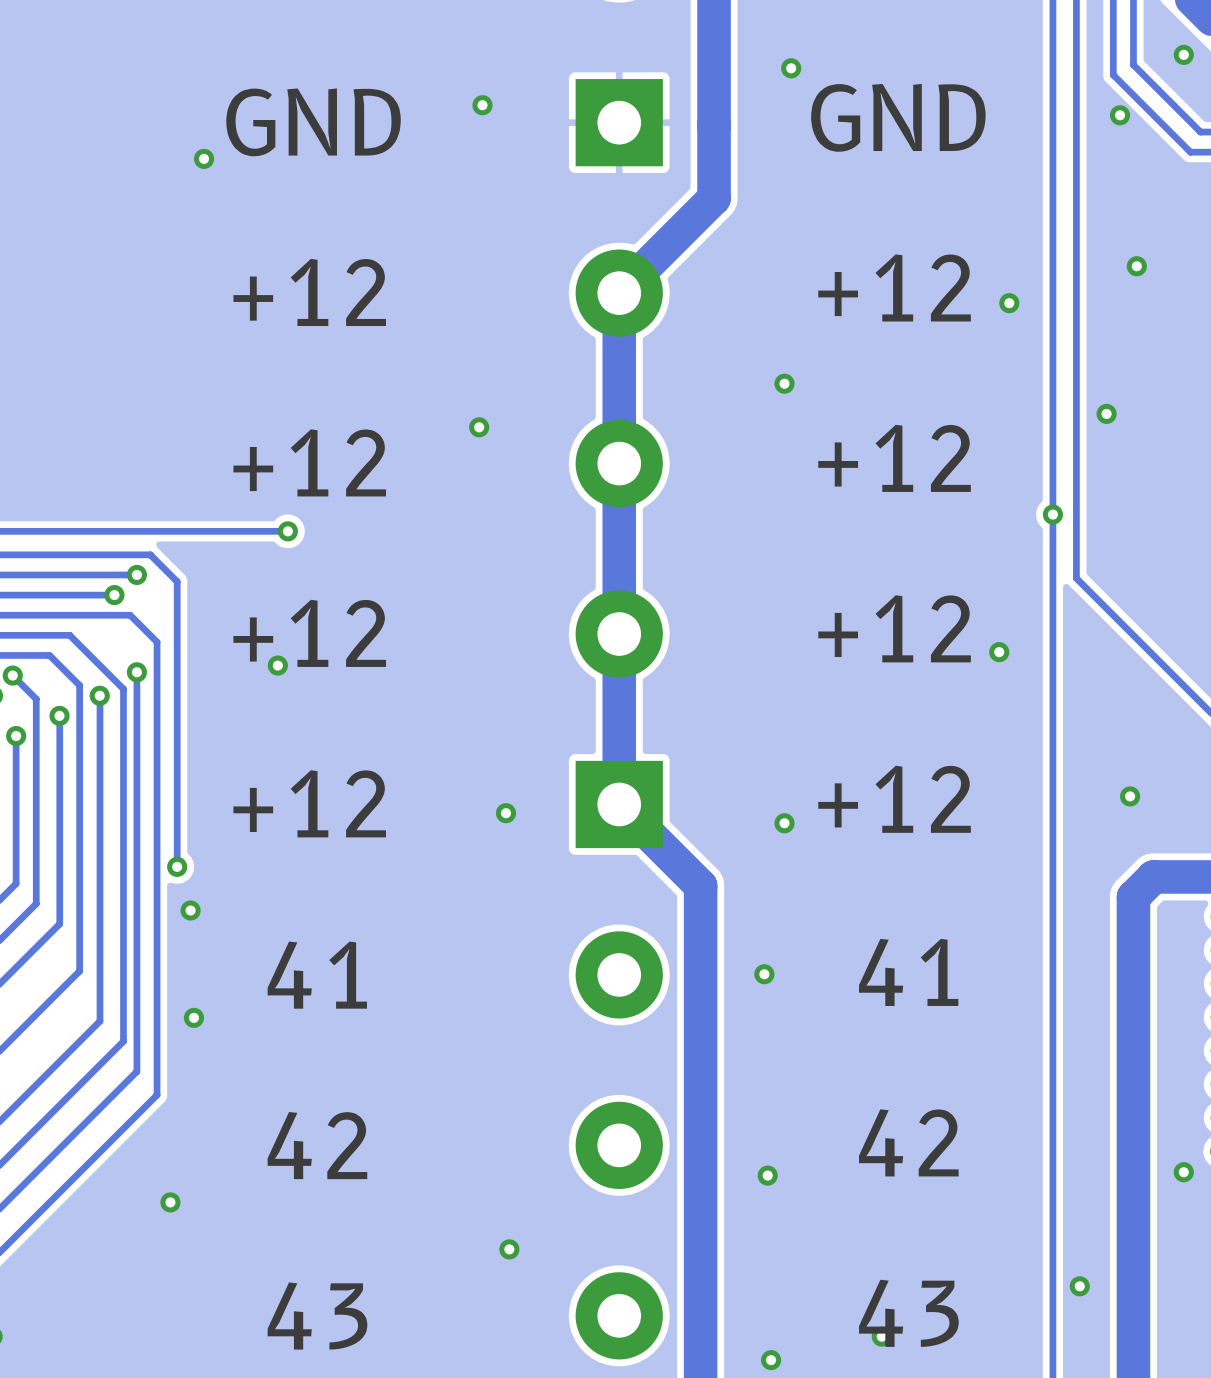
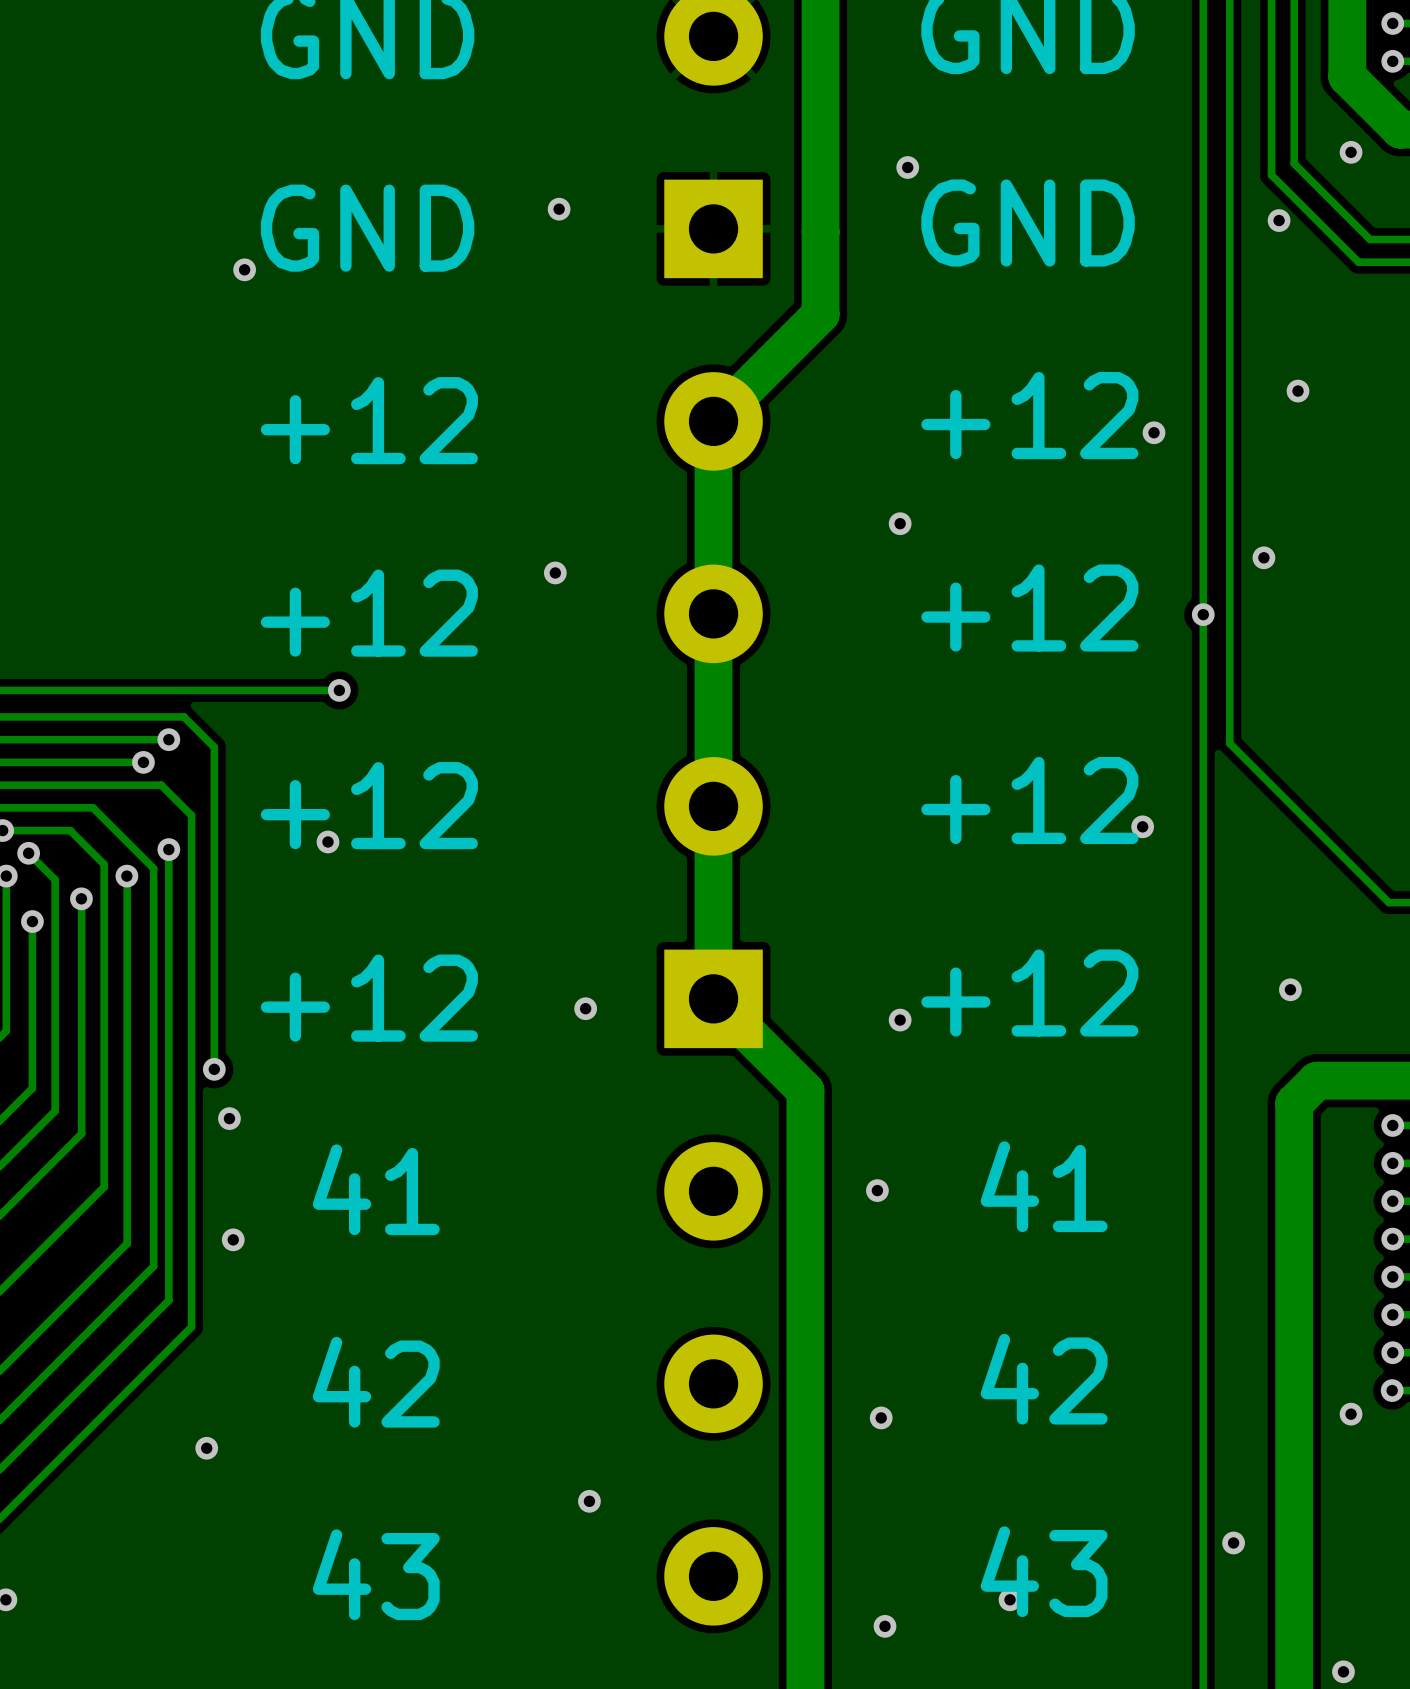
via position: (1052, 514) -> (1203, 614)

